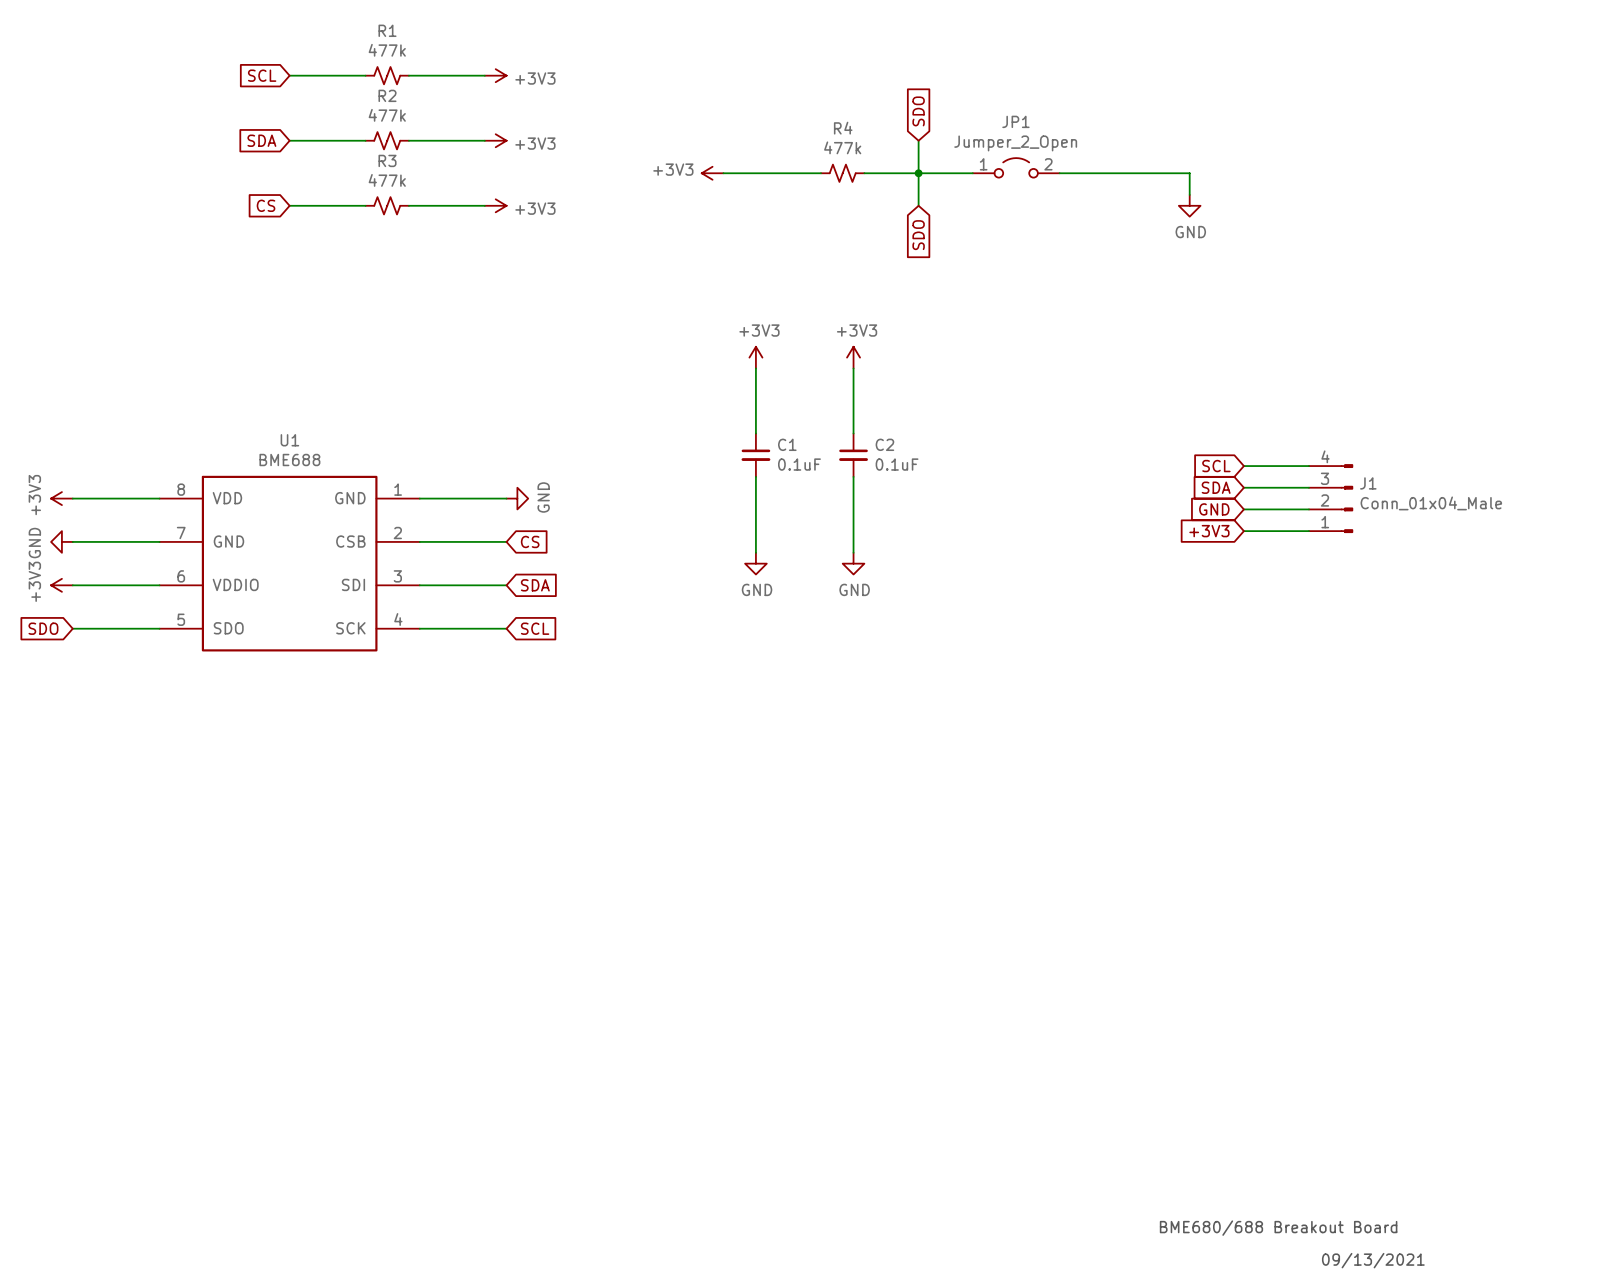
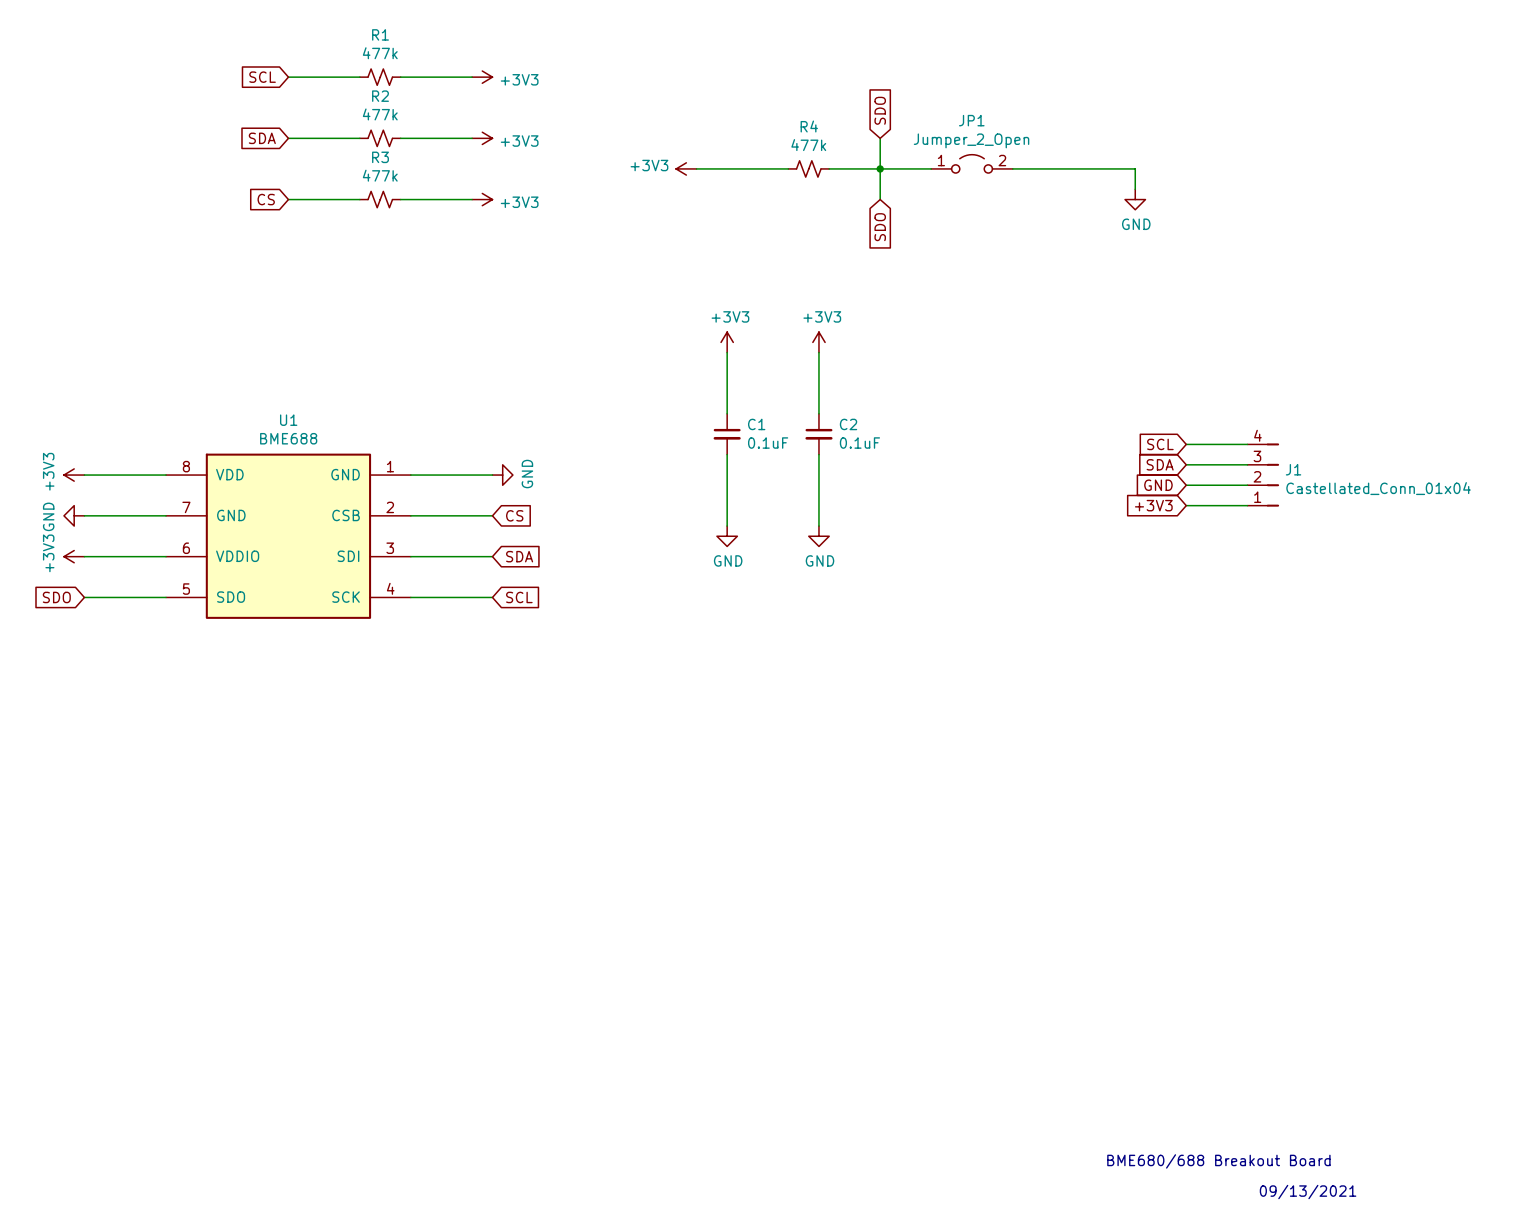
J1 symbol: [1308, 464, 1354, 533] -> [1247, 443, 1280, 507]
J1 value: Conn_01x04_Male (1431, 503) -> Castellated_Conn_01x04 (1378, 488)

